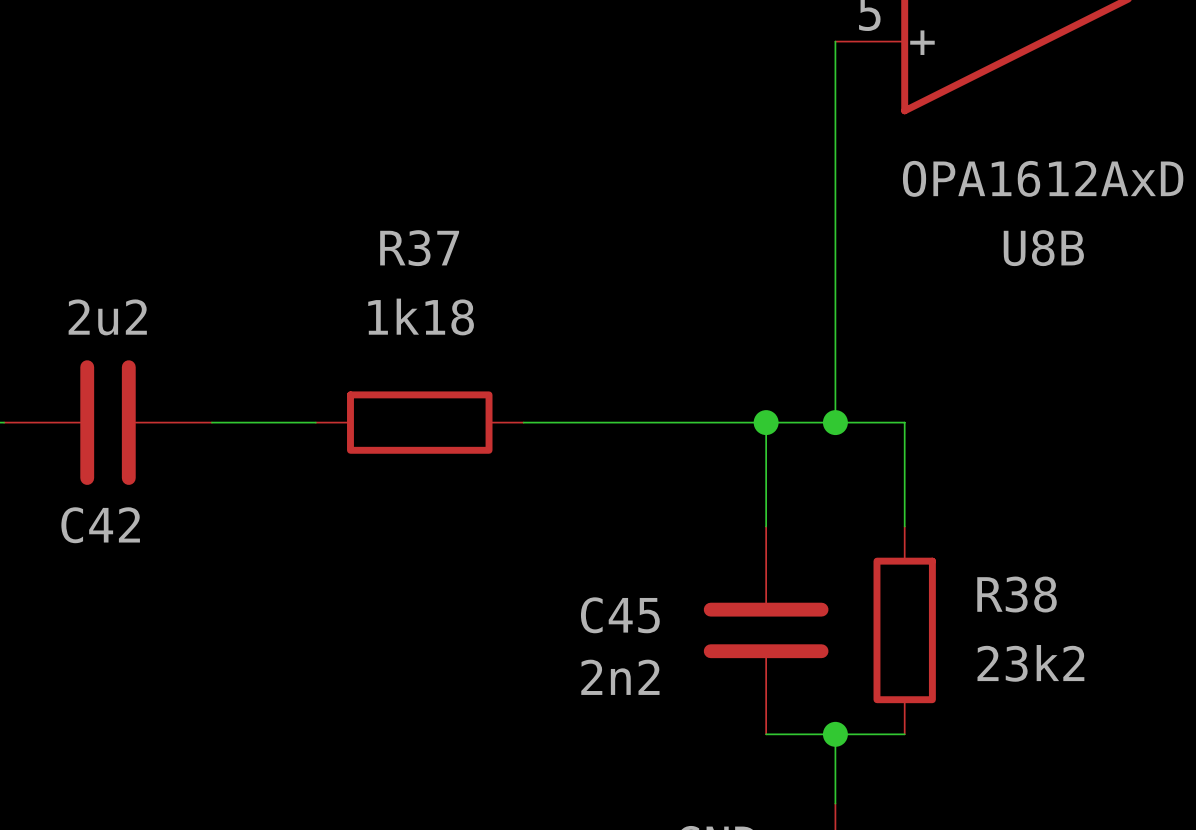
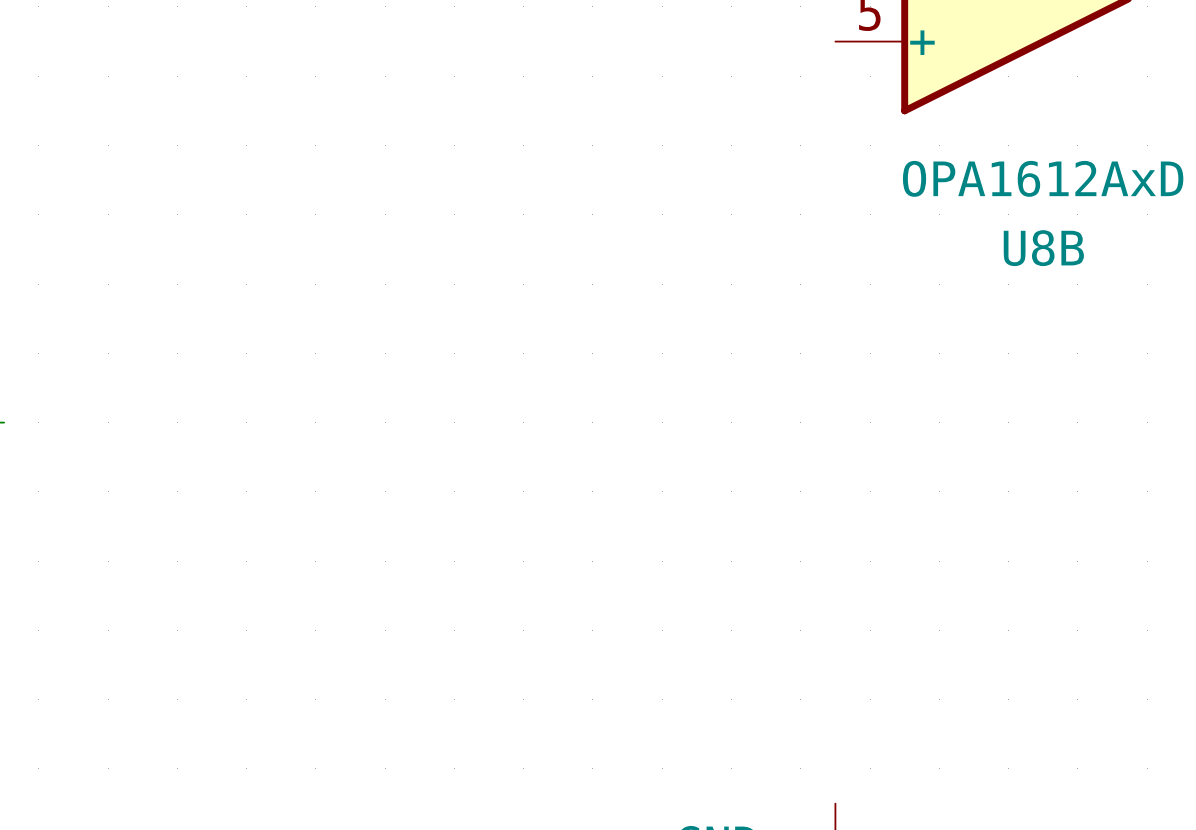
wire: (835, 41) (835, 422) -> none
C42: 2u2 (108, 422) -> none
wire: (211, 422) (315, 422) -> none
R37: 1k18 (419, 422) -> none
wire: (523, 422) (904, 422) (904, 526) -> none
wire: (766, 422) (766, 526) -> none
junction: (766, 422) -> none
junction: (835, 422) -> none
C45: 2n2 (766, 630) -> none
R38: 23k2 (904, 630) -> none
wire: (766, 734) (904, 734) -> none
wire: (835, 734) (835, 803) -> none
junction: (835, 734) -> none

